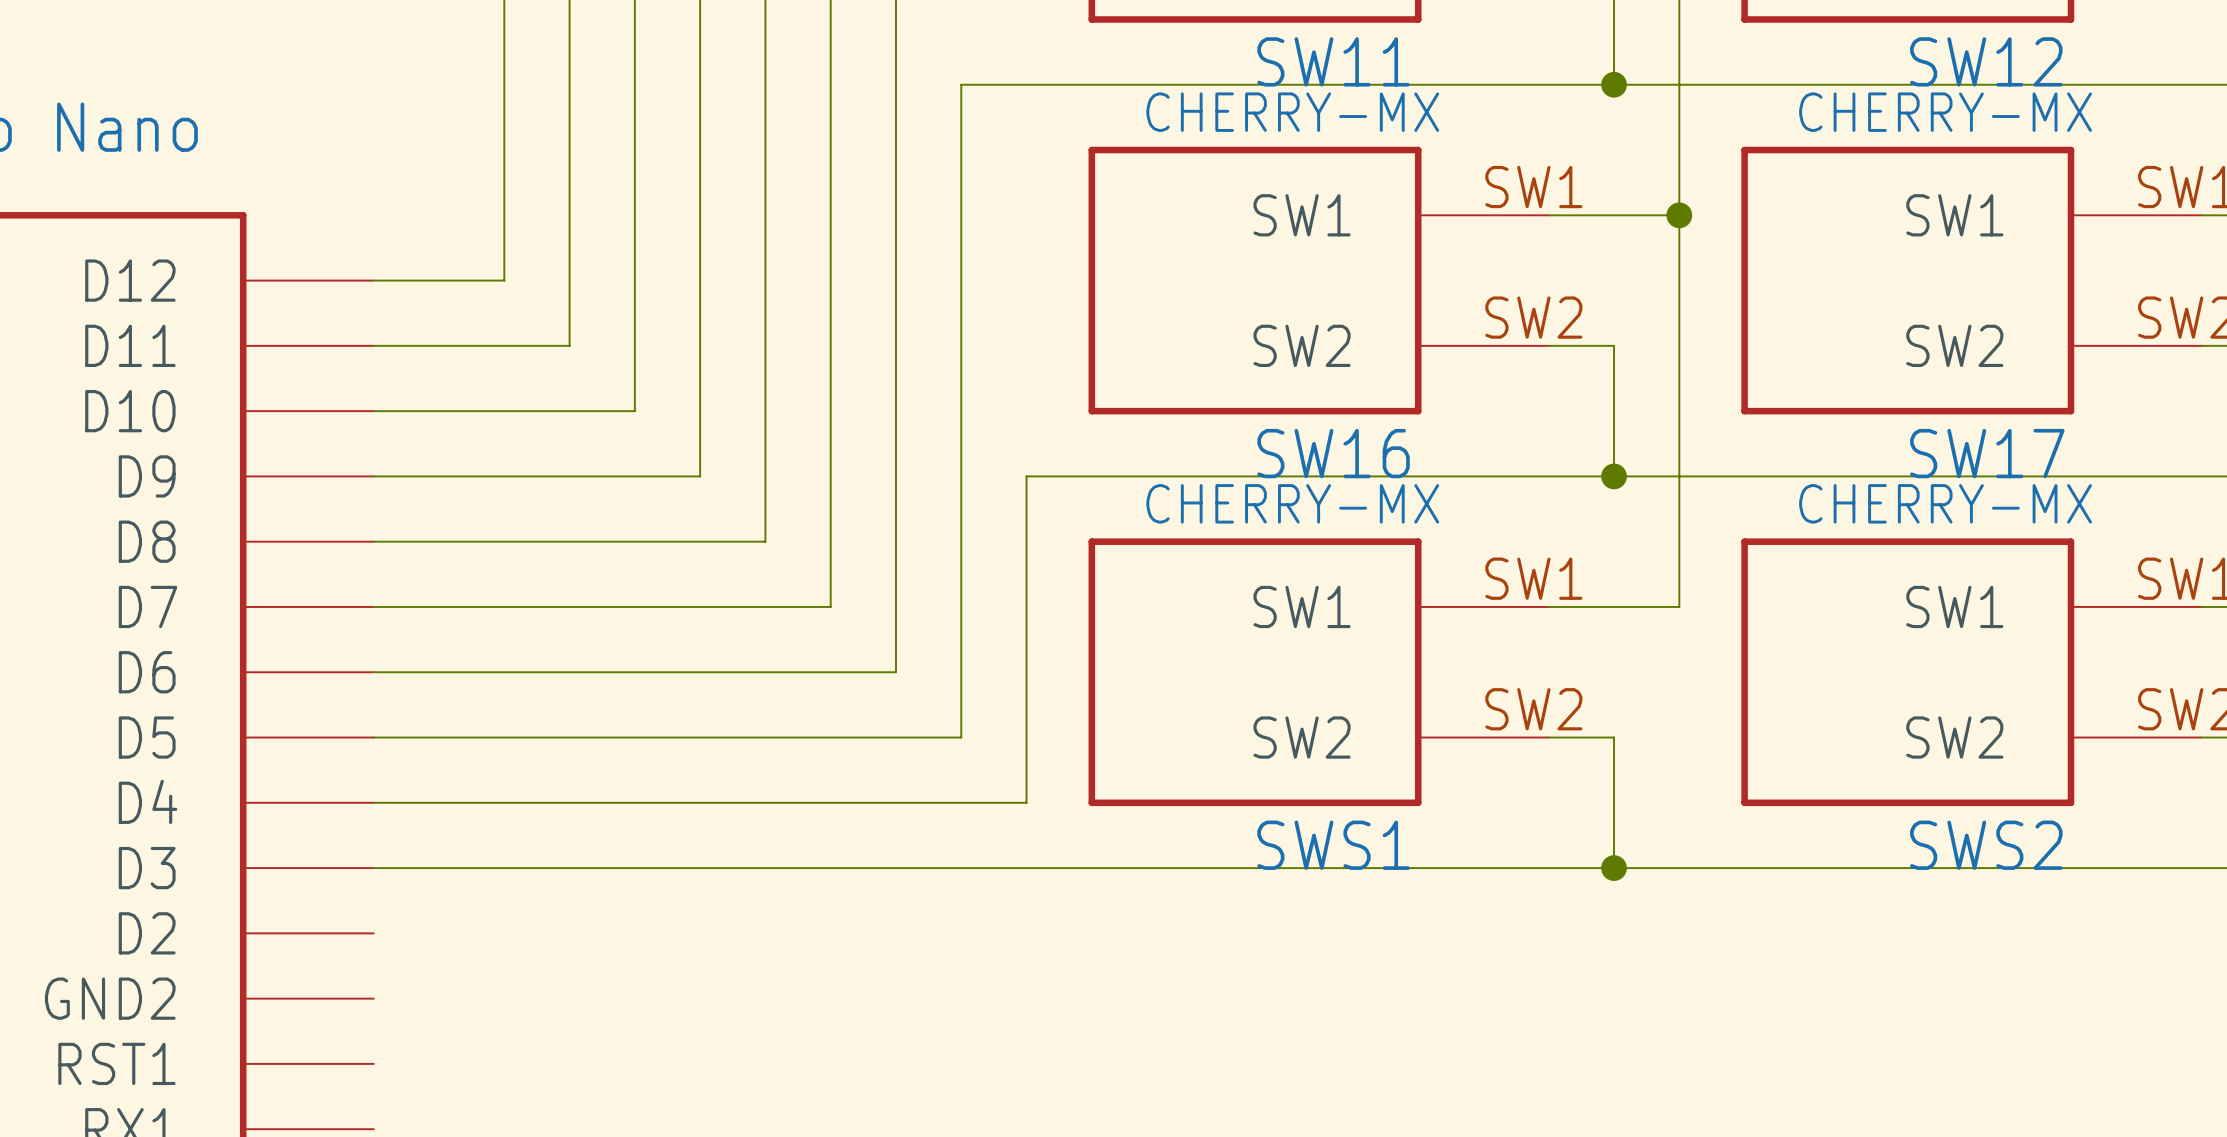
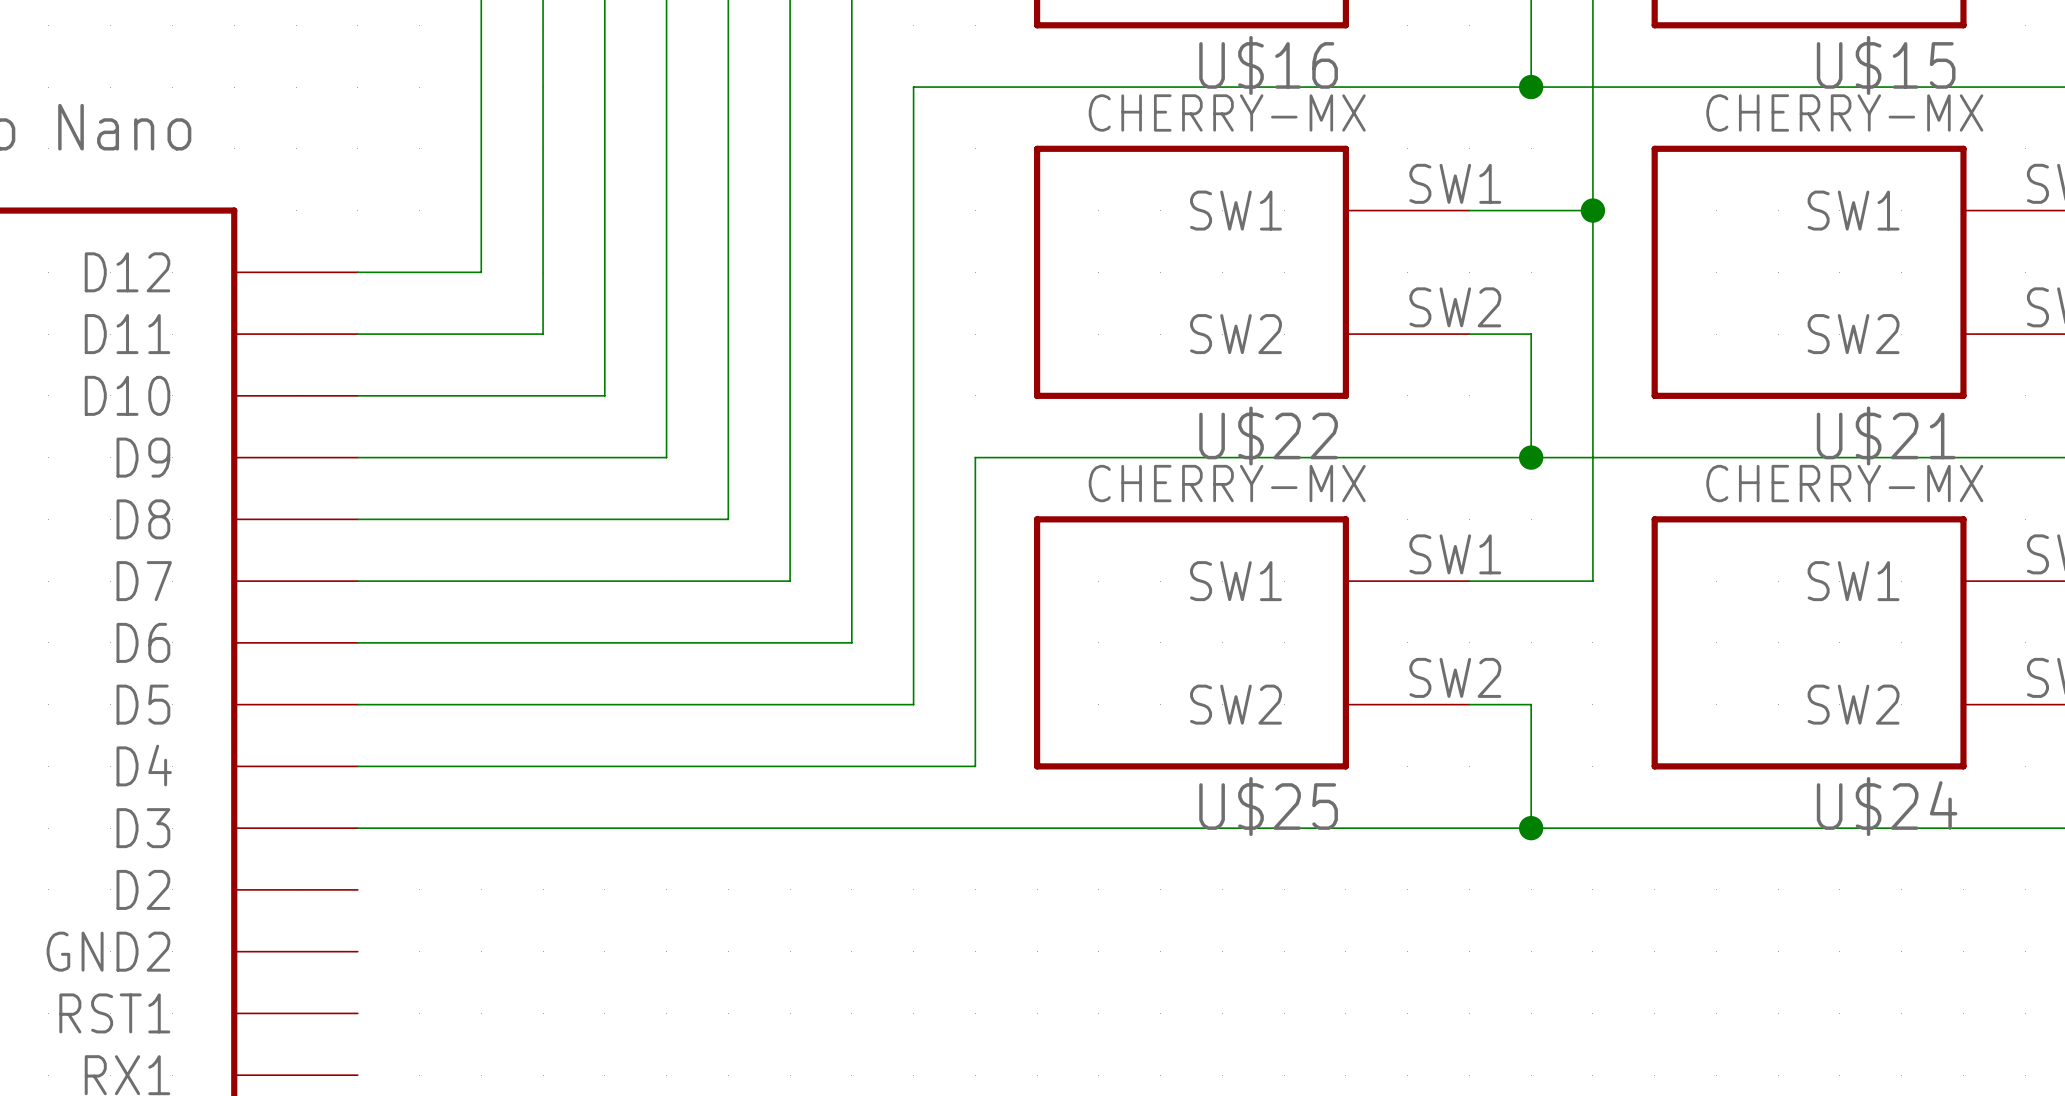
SW11 name: SW11 (1333, 61) -> U$16 (1268, 65)
SW12 name: SW12 (1986, 61) -> U$15 (1886, 65)
SW16 name: SW16 (1333, 453) -> U$22 (1268, 435)
SW17 name: SW17 (1987, 453) -> U$21 (1886, 435)
SWS1 name: SWS1 (1333, 845) -> U$25 (1268, 806)
SWS2 name: SWS2 (1986, 845) -> U$24 (1887, 806)

